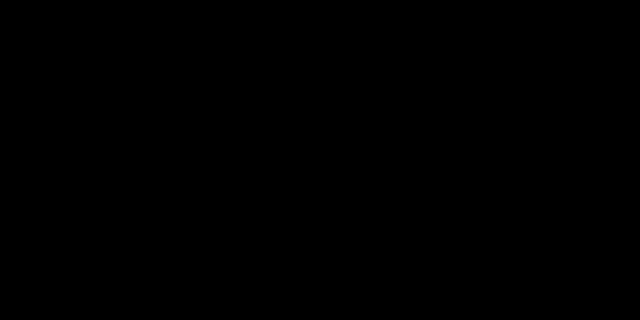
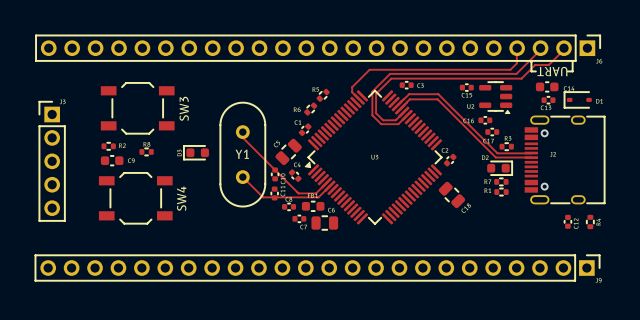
part: none -> (318, 48)
track: none -> (516, 50) (516, 63) (510, 69) (369, 69) (352, 87) (352, 92) (359, 99)
track: none -> (540, 50) (516, 73) (390, 73) (372, 91) (372, 115) (381, 124) (398, 124) (407, 115)
track: none -> (563, 50) (548, 65) (535, 65) (521, 78) (391, 78) (376, 93) (376, 113) (383, 120) (395, 120) (403, 112)
line: none -> (531, 61) (531, 71) (535, 71)
line: none -> (572, 61) (572, 71) (567, 71)
text: none -> UART (552, 71)
part: none -> (406, 85)
part: none -> (547, 86)
part: none -> (466, 87)
part: none -> (323, 95)
part: none -> (495, 97)
part: none -> (577, 99)
part: none -> (548, 100)
track: none -> (397, 105) (409, 94) (438, 94) (497, 153) (531, 153)
SW3: none -> (137, 108)
track: none -> (400, 108) (409, 99) (437, 99) (495, 157) (531, 157)
part: none -> (310, 109)
part: none -> (485, 120)
part: none -> (305, 129)
track: none -> (242, 131) (242, 137) (298, 193) (316, 193) (326, 182)
part: none -> (492, 132)
part: none -> (108, 146)
part: none -> (506, 146)
part: none -> (146, 151)
part: none -> (288, 151)
part: none -> (196, 152)
Y1: none -> (242, 154)
part: none -> (373, 157)
part: none -> (564, 159)
part: none -> (112, 160)
part: none -> (450, 160)
part: none -> (52, 161)
part: none -> (499, 168)
part: none -> (275, 174)
part: none -> (295, 175)
track: none -> (242, 177) (263, 197) (318, 197) (329, 186)
part: none -> (501, 181)
part: none -> (501, 192)
part: none -> (274, 193)
part: none -> (451, 194)
SW4: none -> (135, 198)
part: none -> (289, 206)
part: none -> (313, 206)
part: none -> (299, 218)
part: none -> (567, 221)
part: none -> (590, 222)
part: none -> (324, 223)
part: none -> (317, 268)

